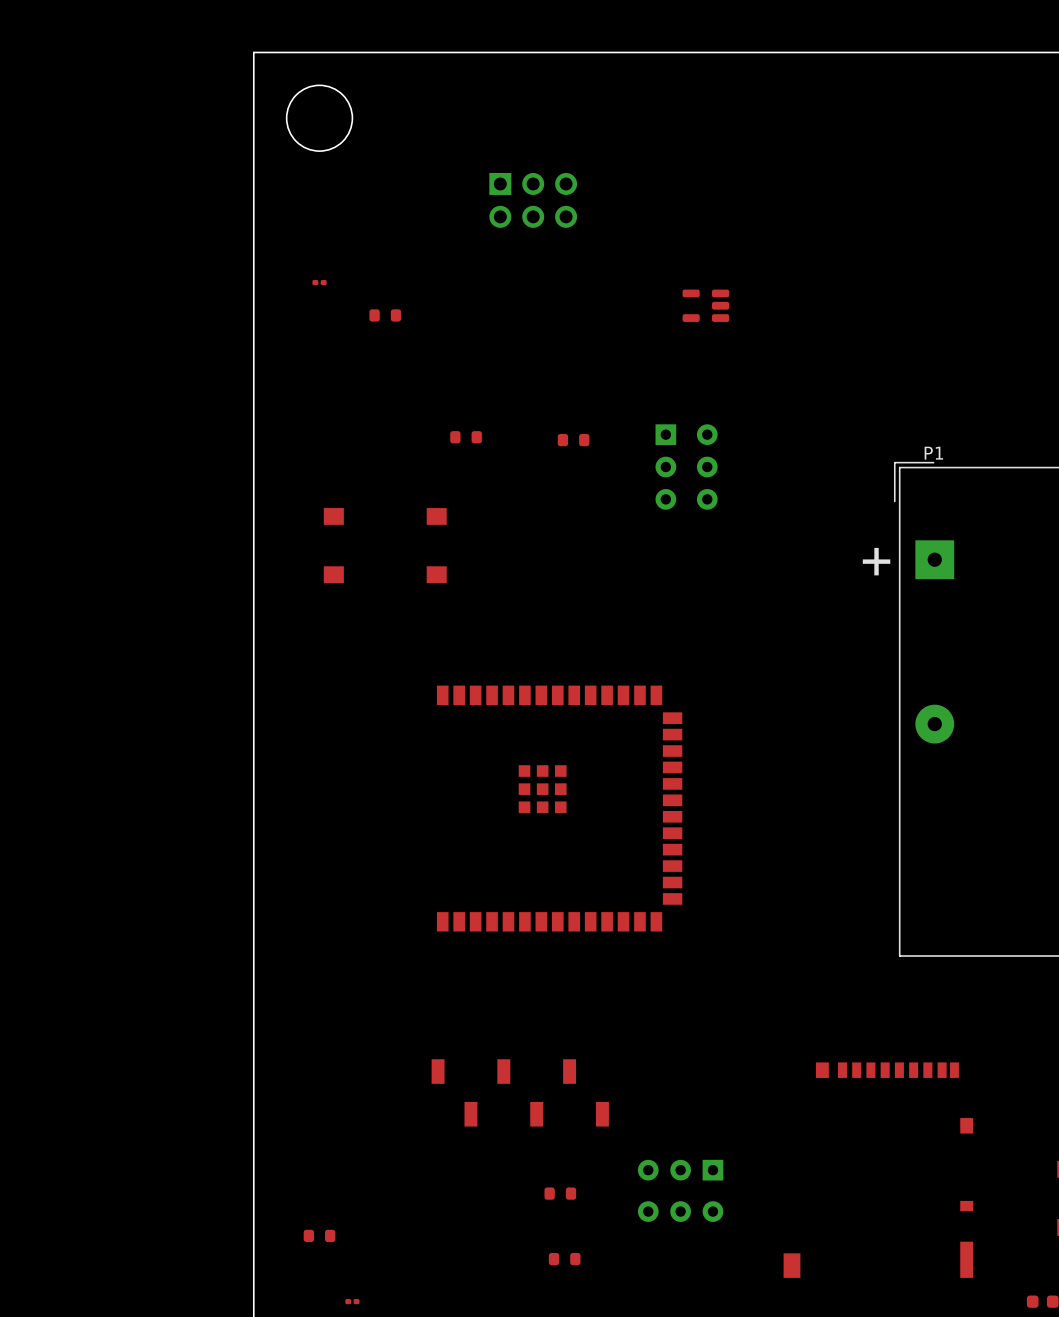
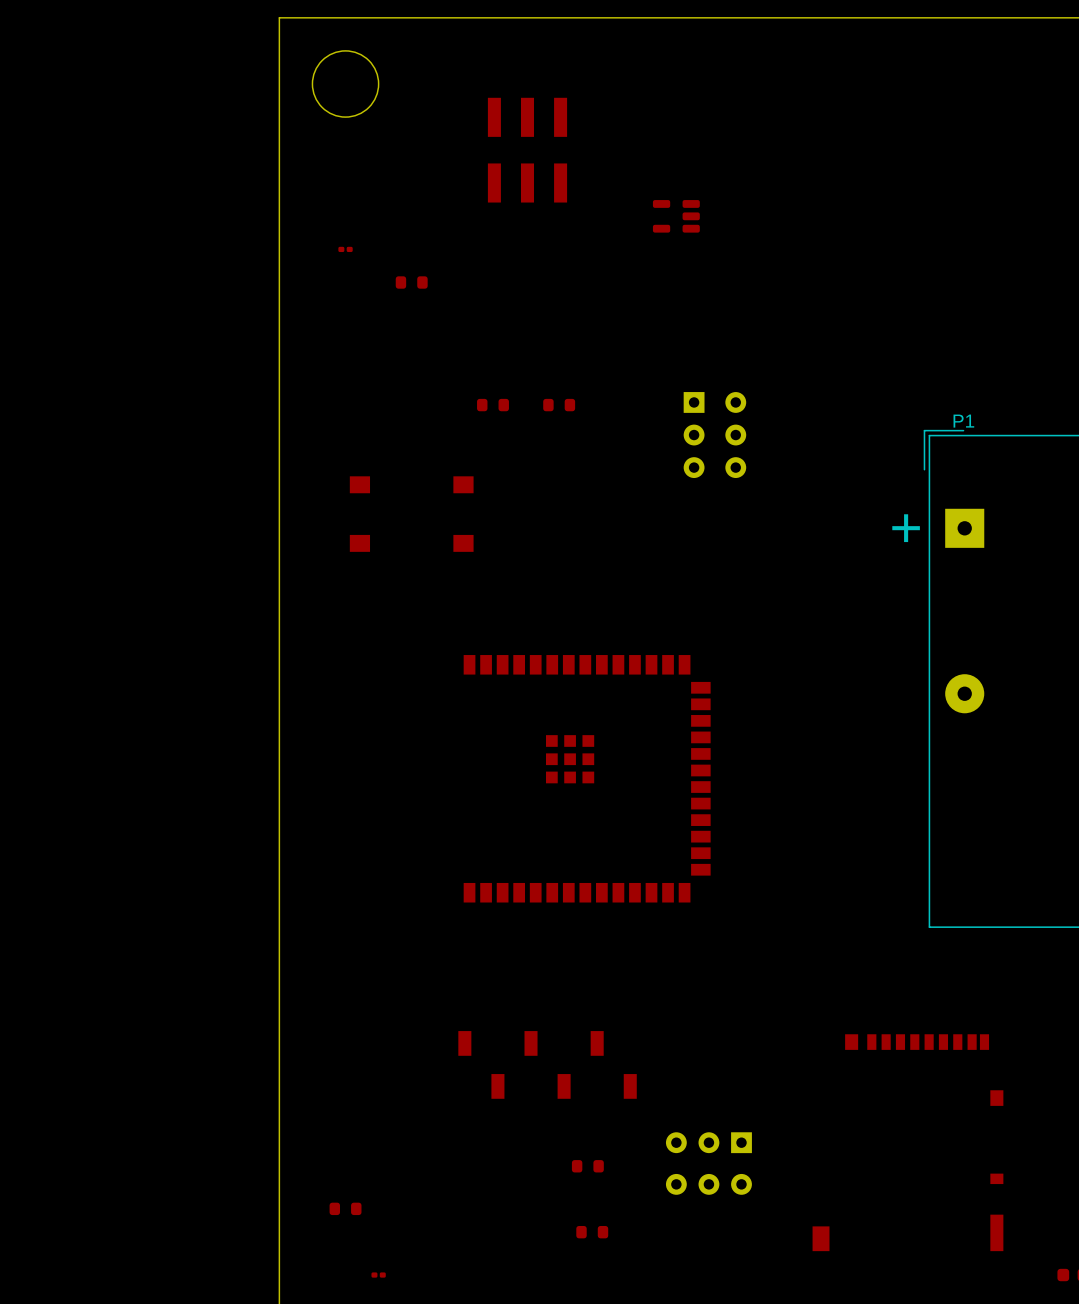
part: none -> (527, 150)
part: (533, 200) -> none
part position: (705, 305) -> (676, 216)
part position: (573, 440) -> (559, 405)

